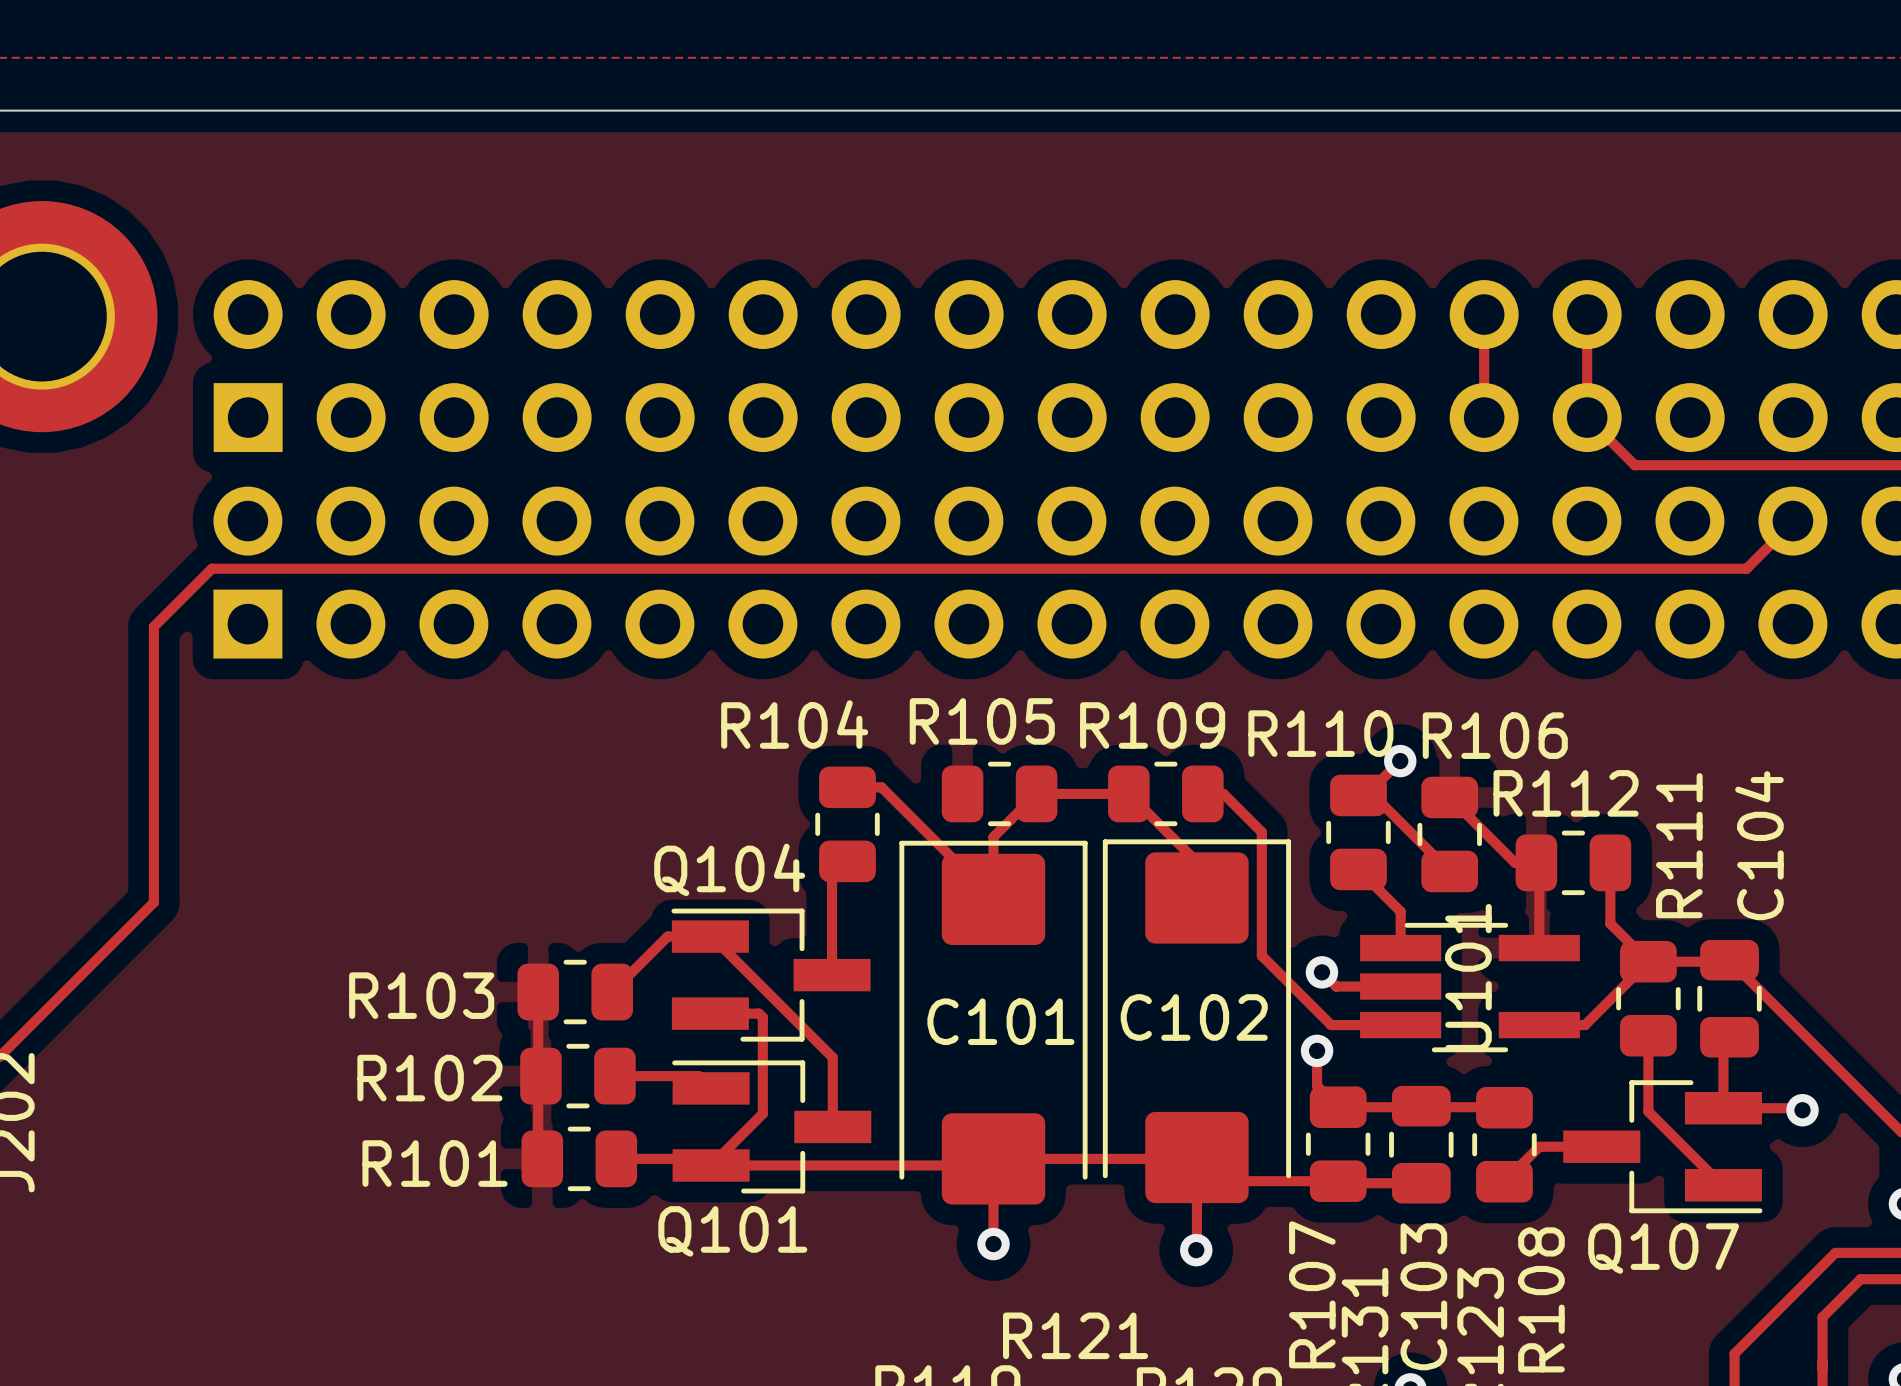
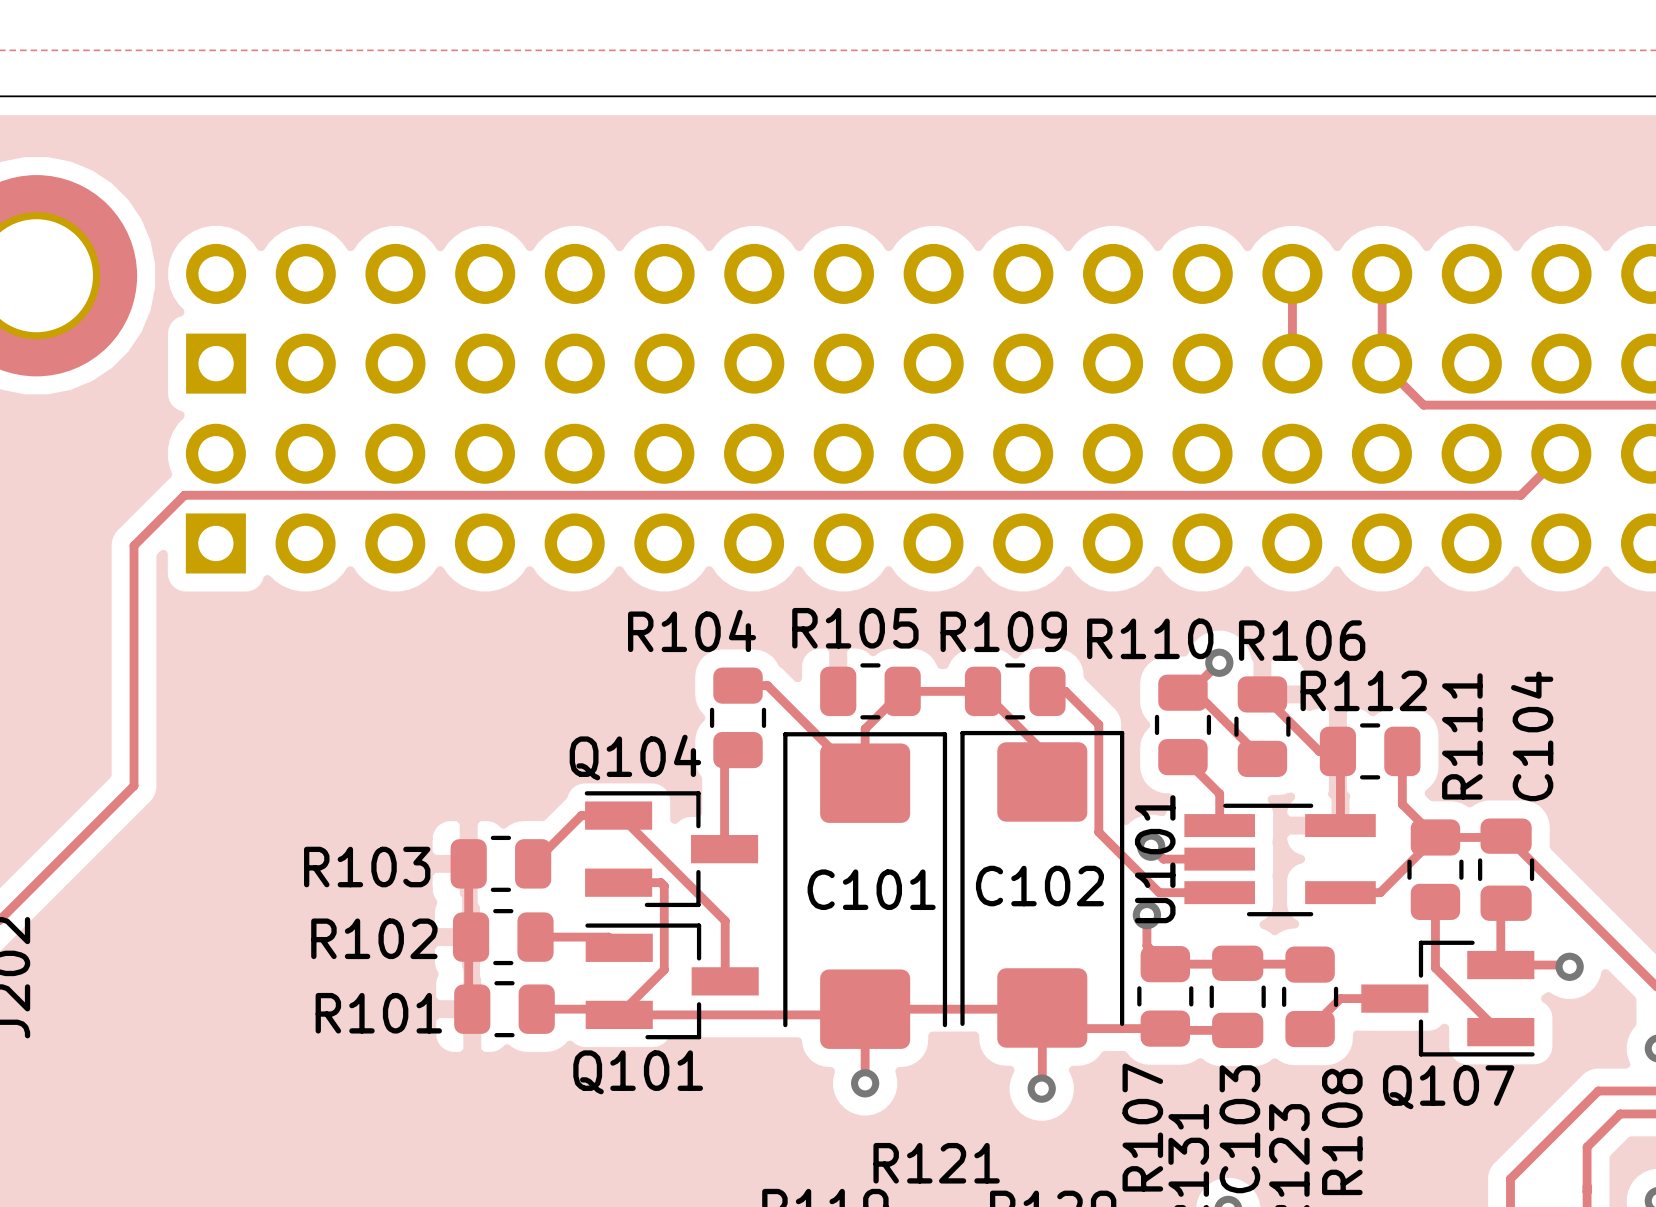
U101 name position: U101 (1468, 977) -> U101 (1155, 859)

